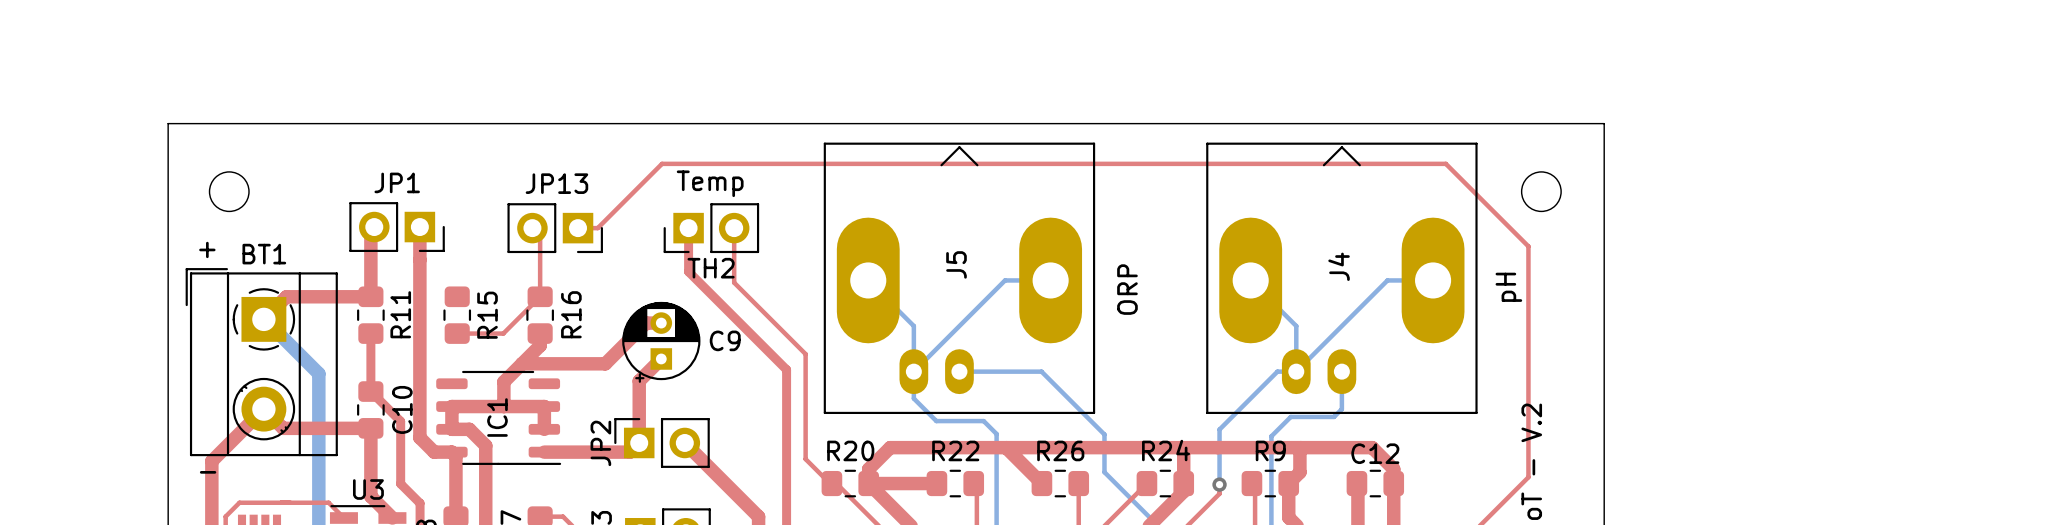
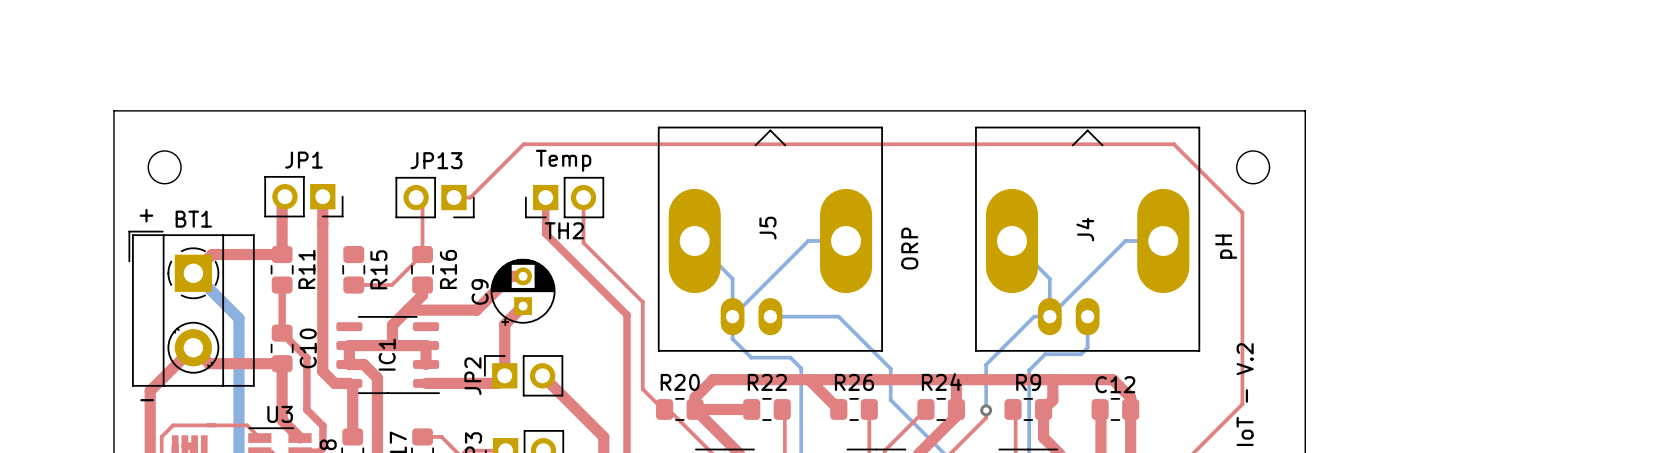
C9 name rotation: 0° (725, 340) -> 90° counterclockwise (480, 291)
C9 name position: C9 (725, 340) -> C9 (480, 291)

